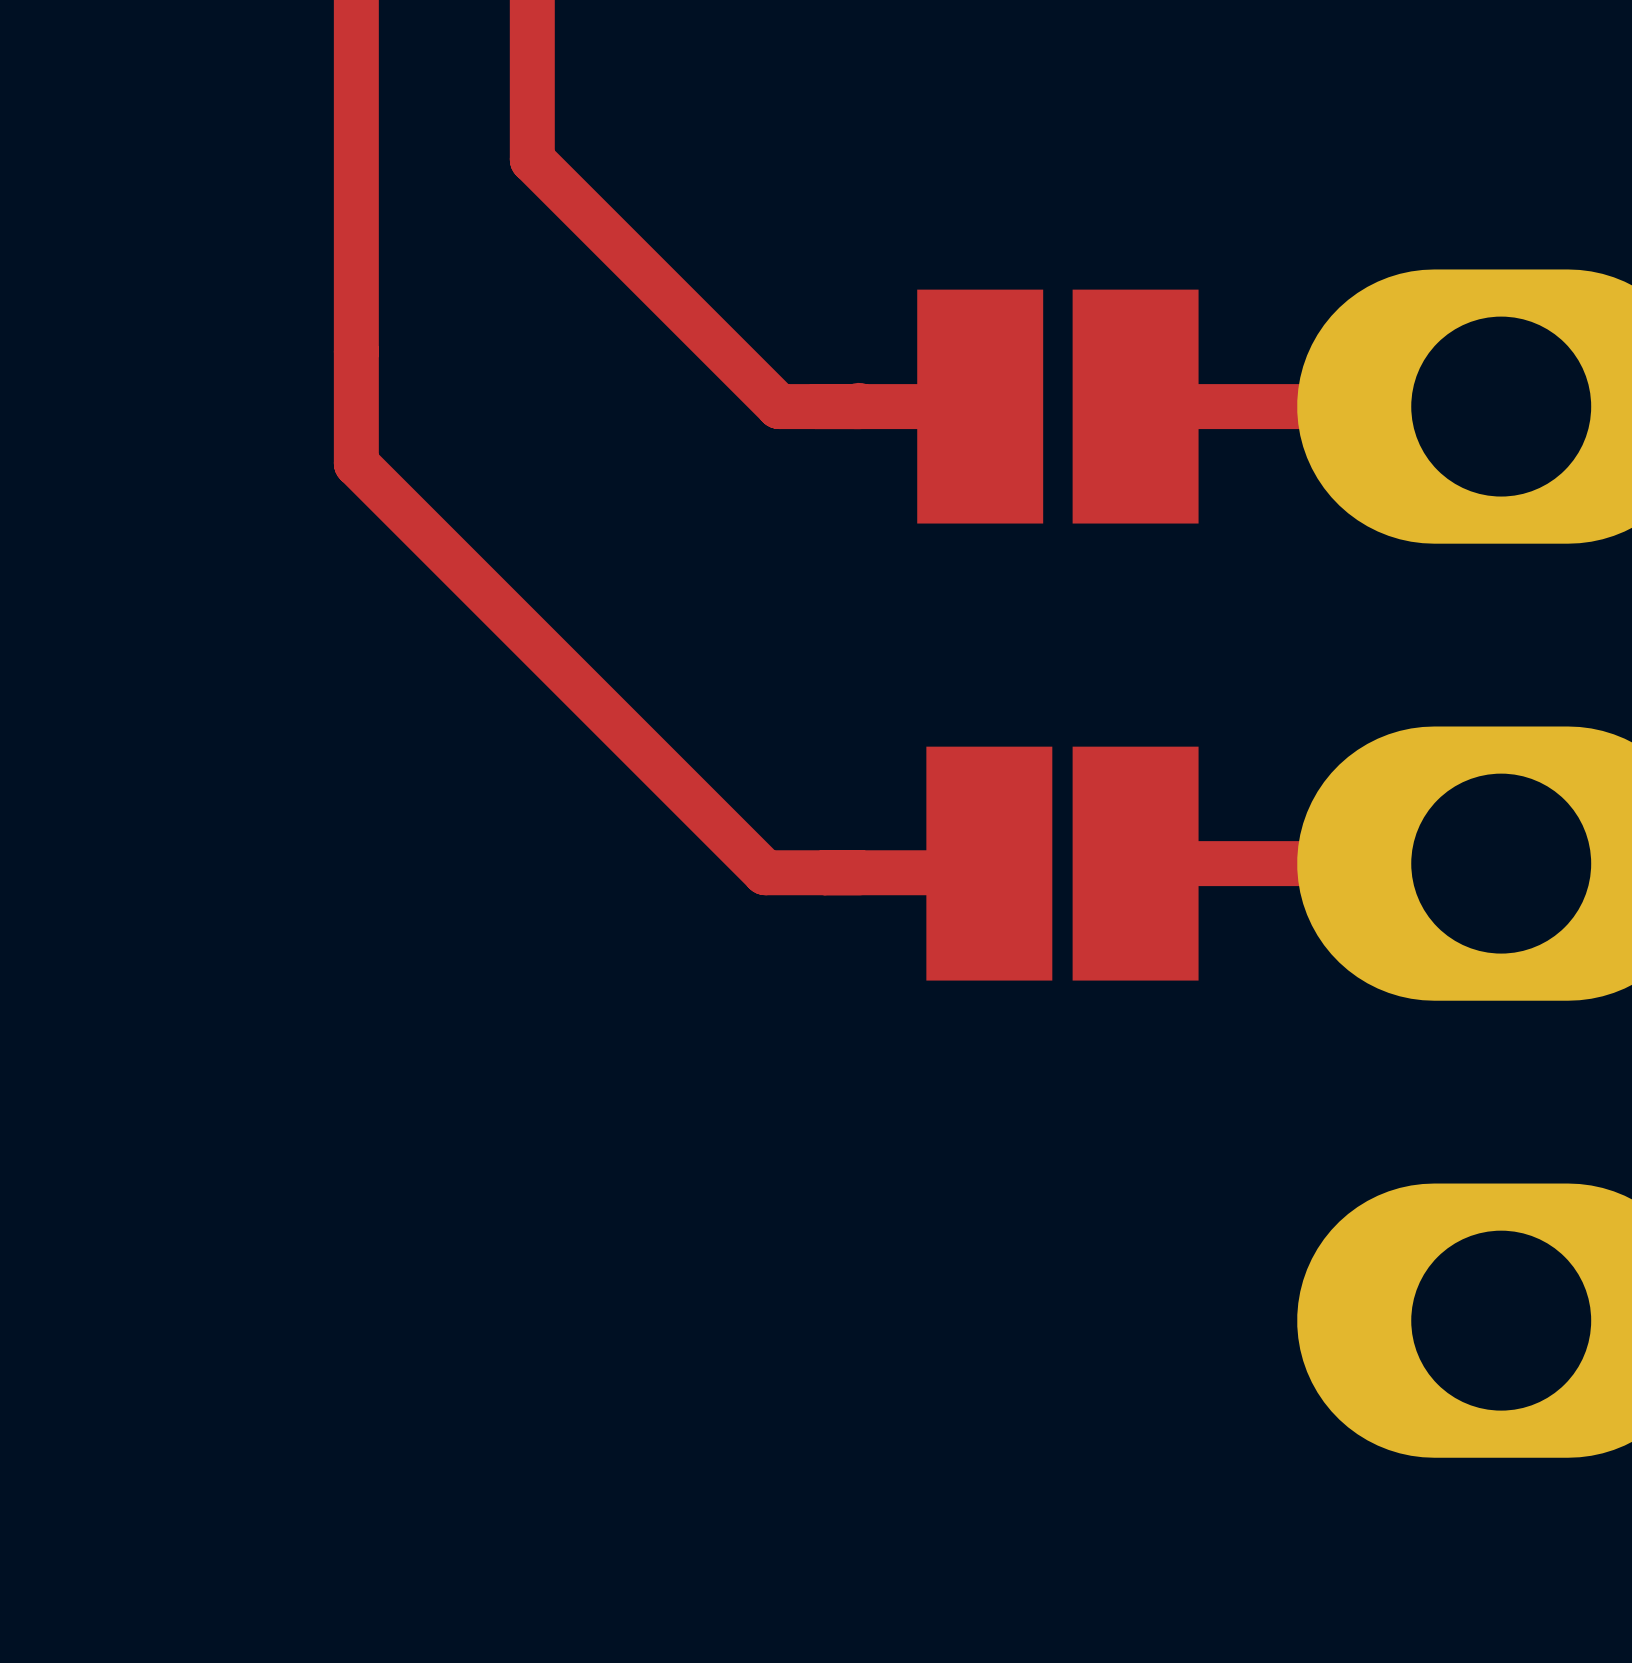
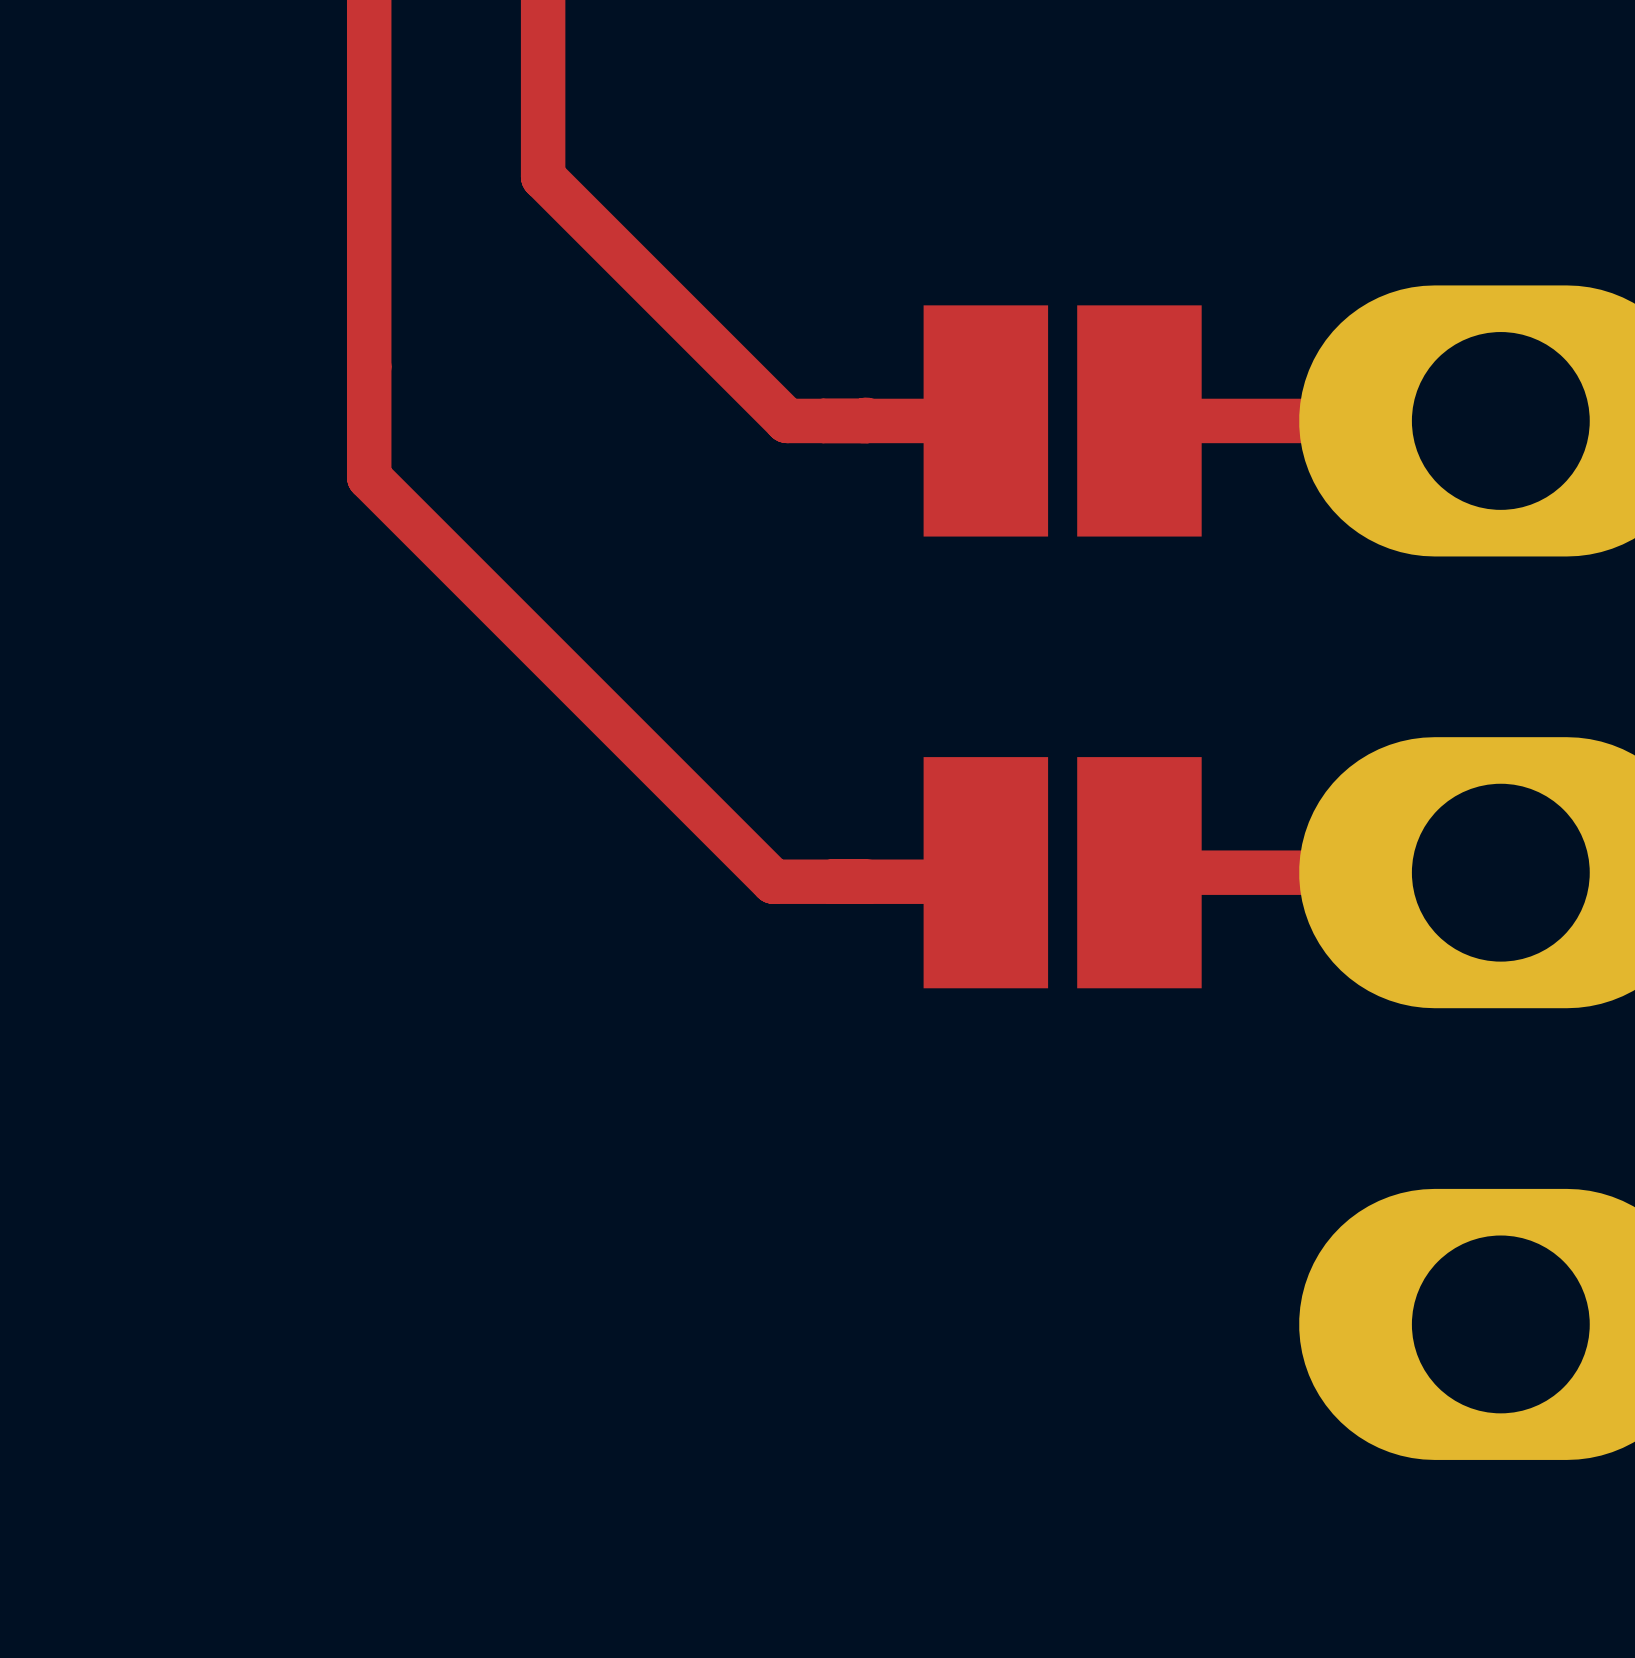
part footprint: [926, 746, 1199, 981] -> [923, 757, 1202, 989]

